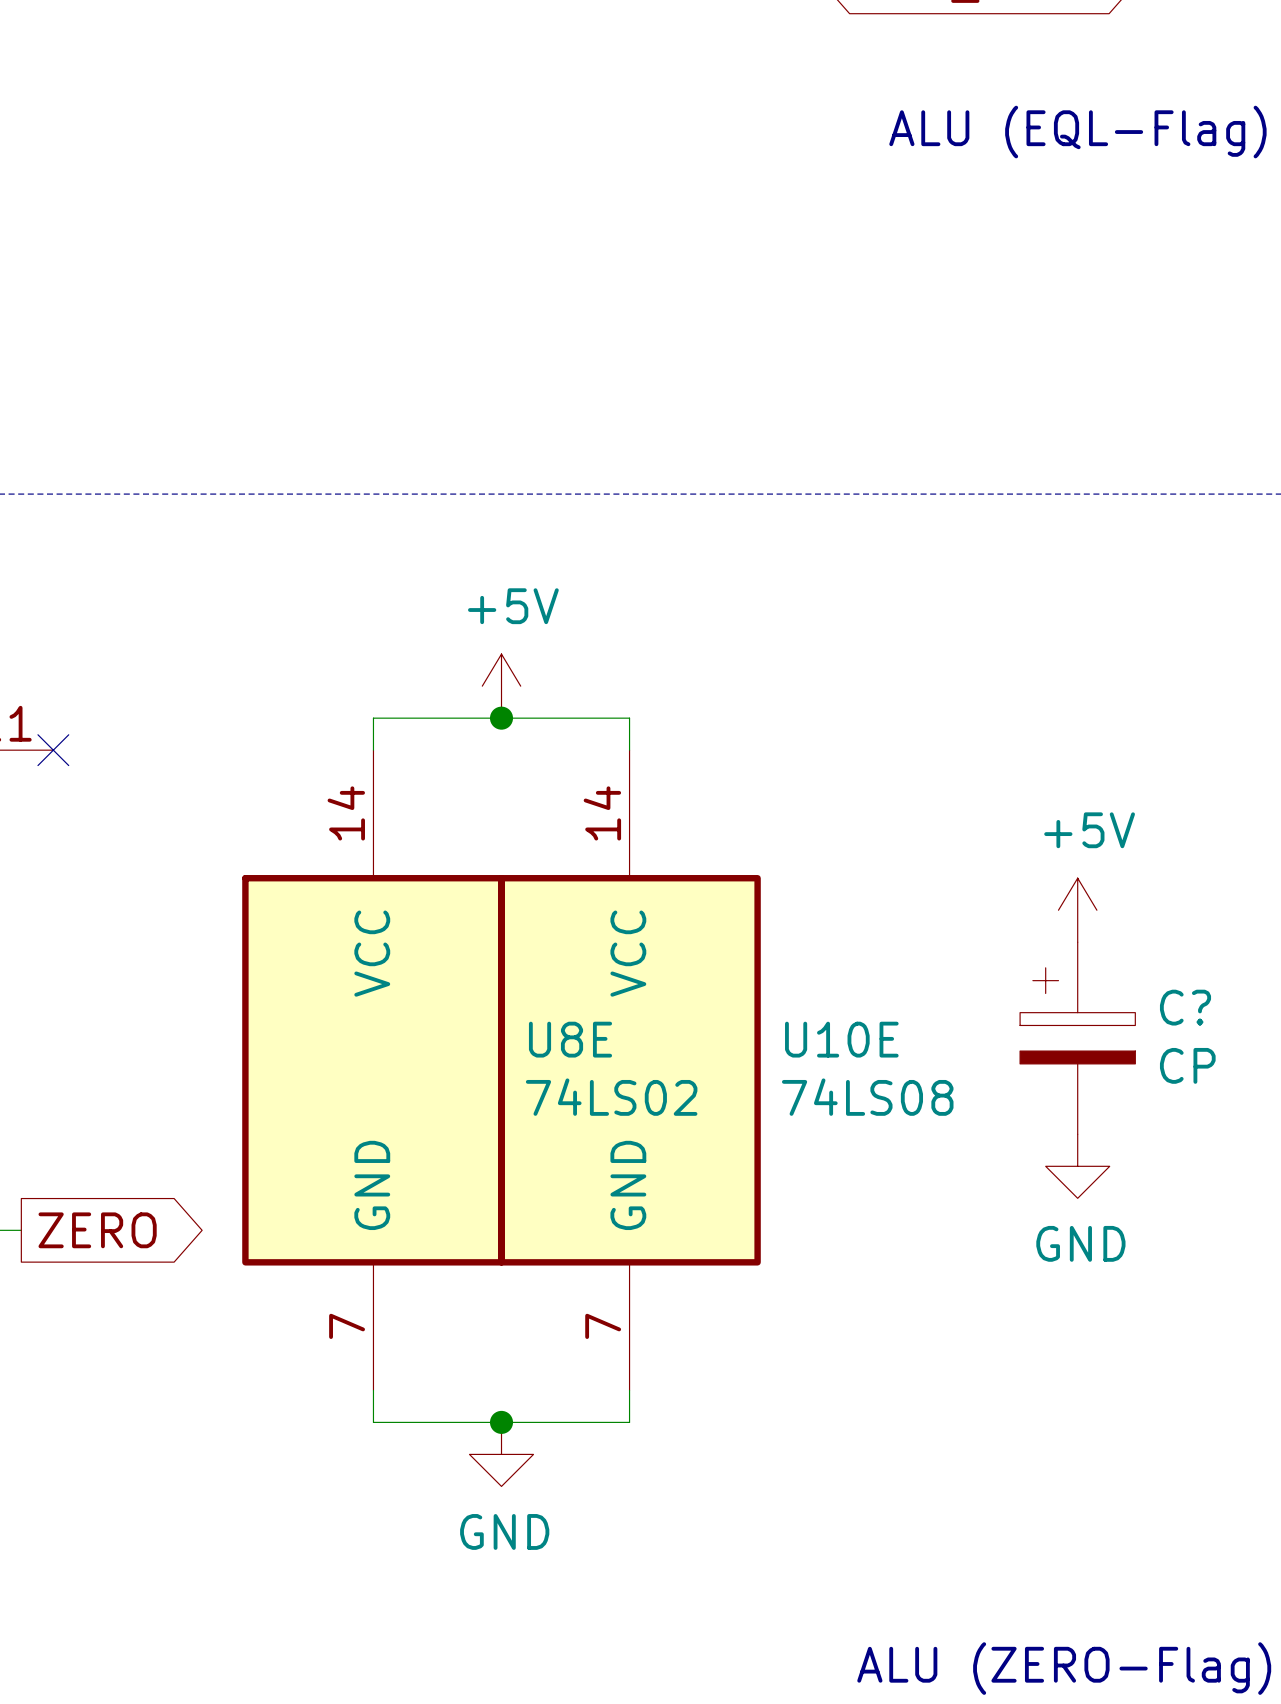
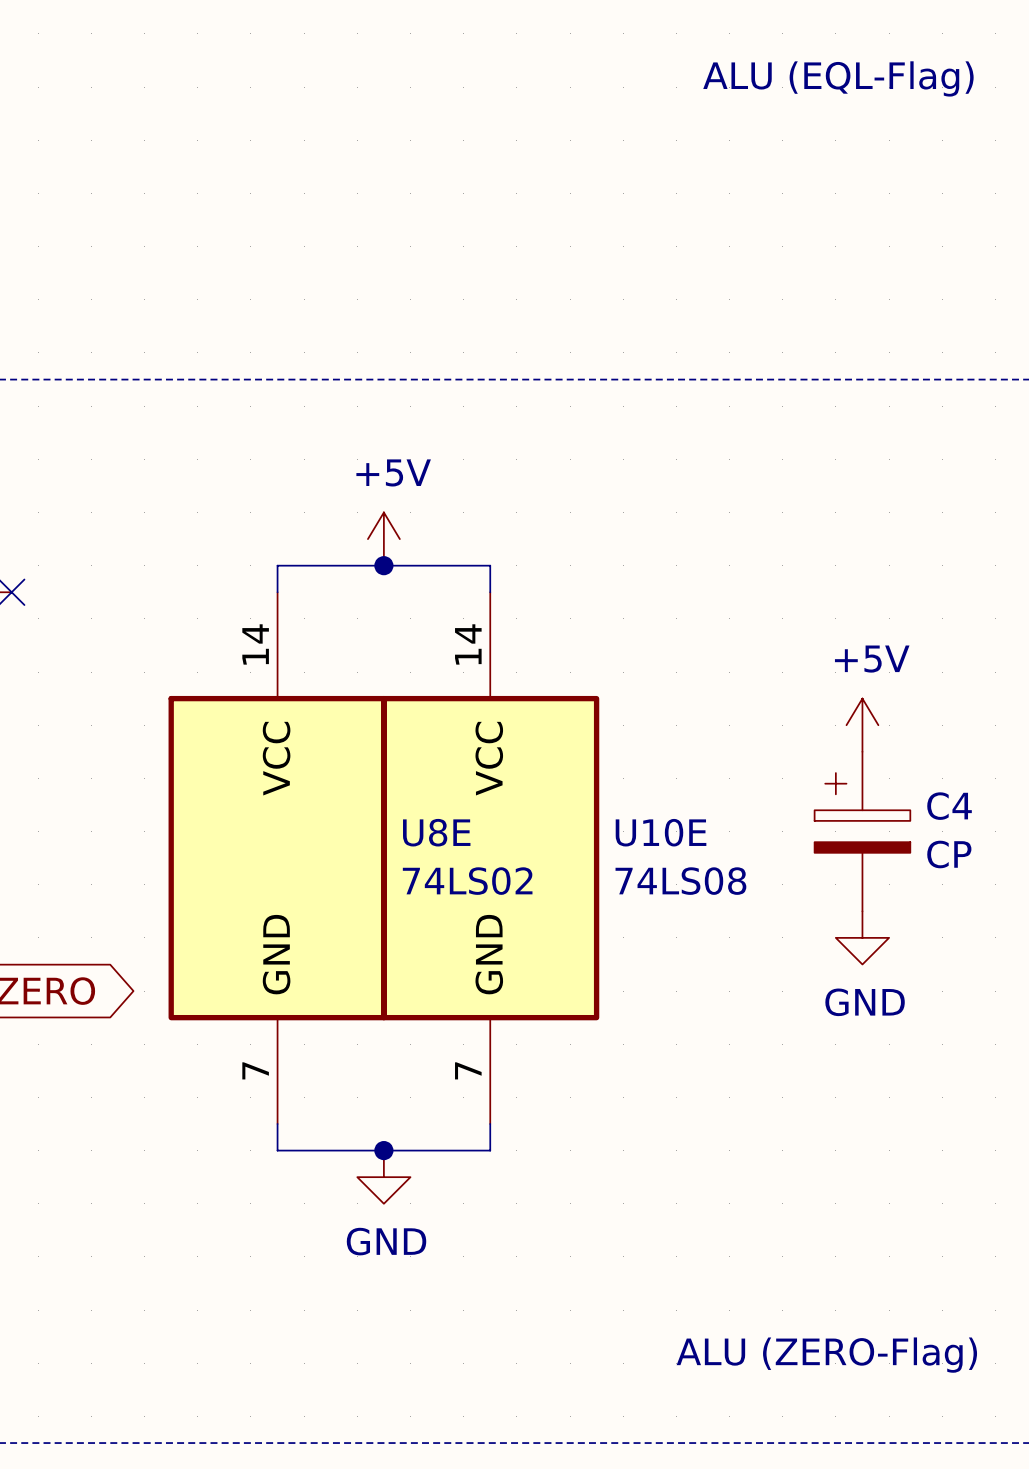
C? name: C? (1185, 1007) -> C4 (949, 806)

